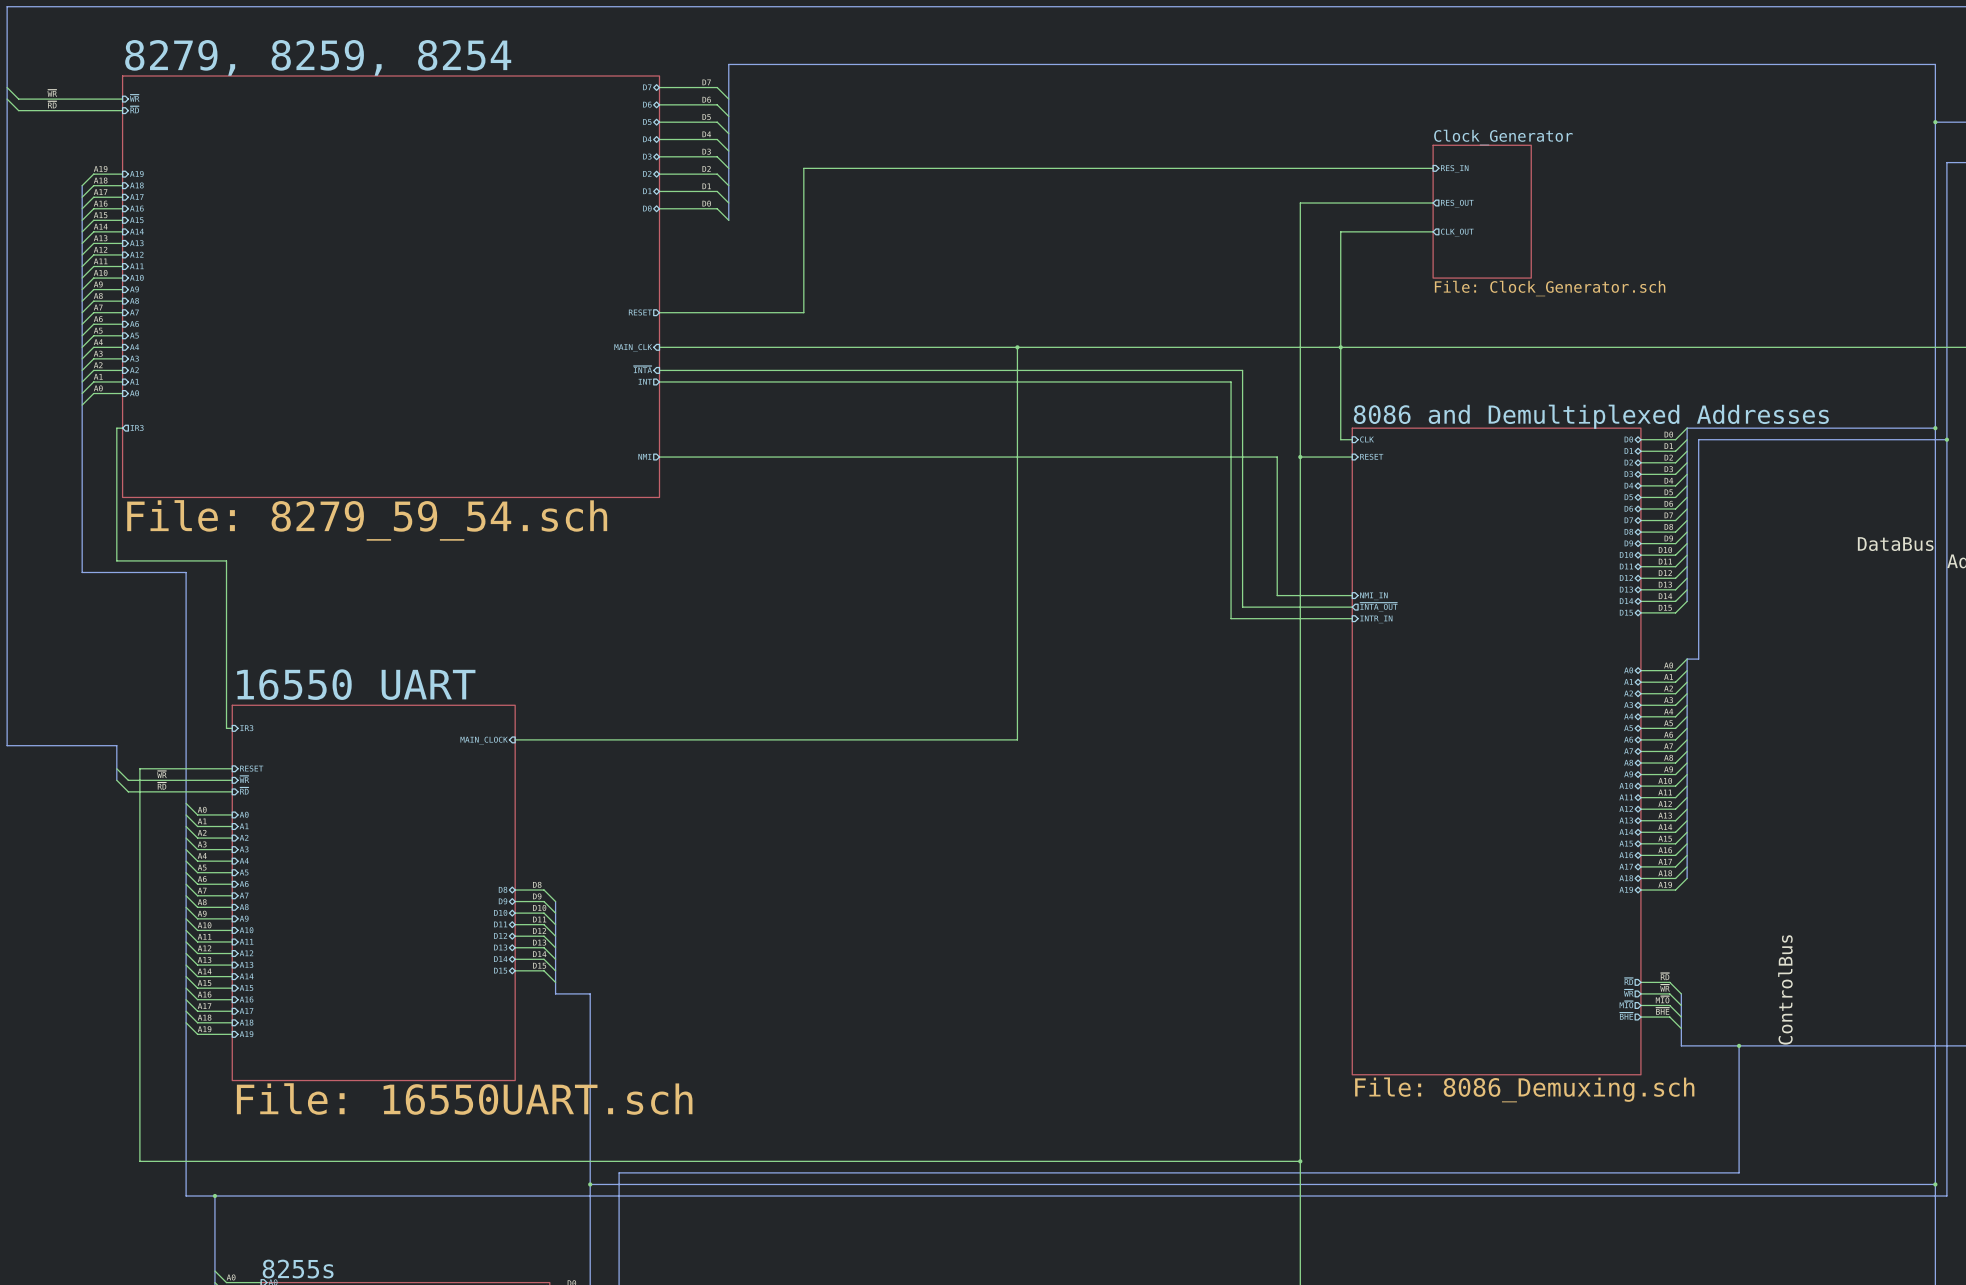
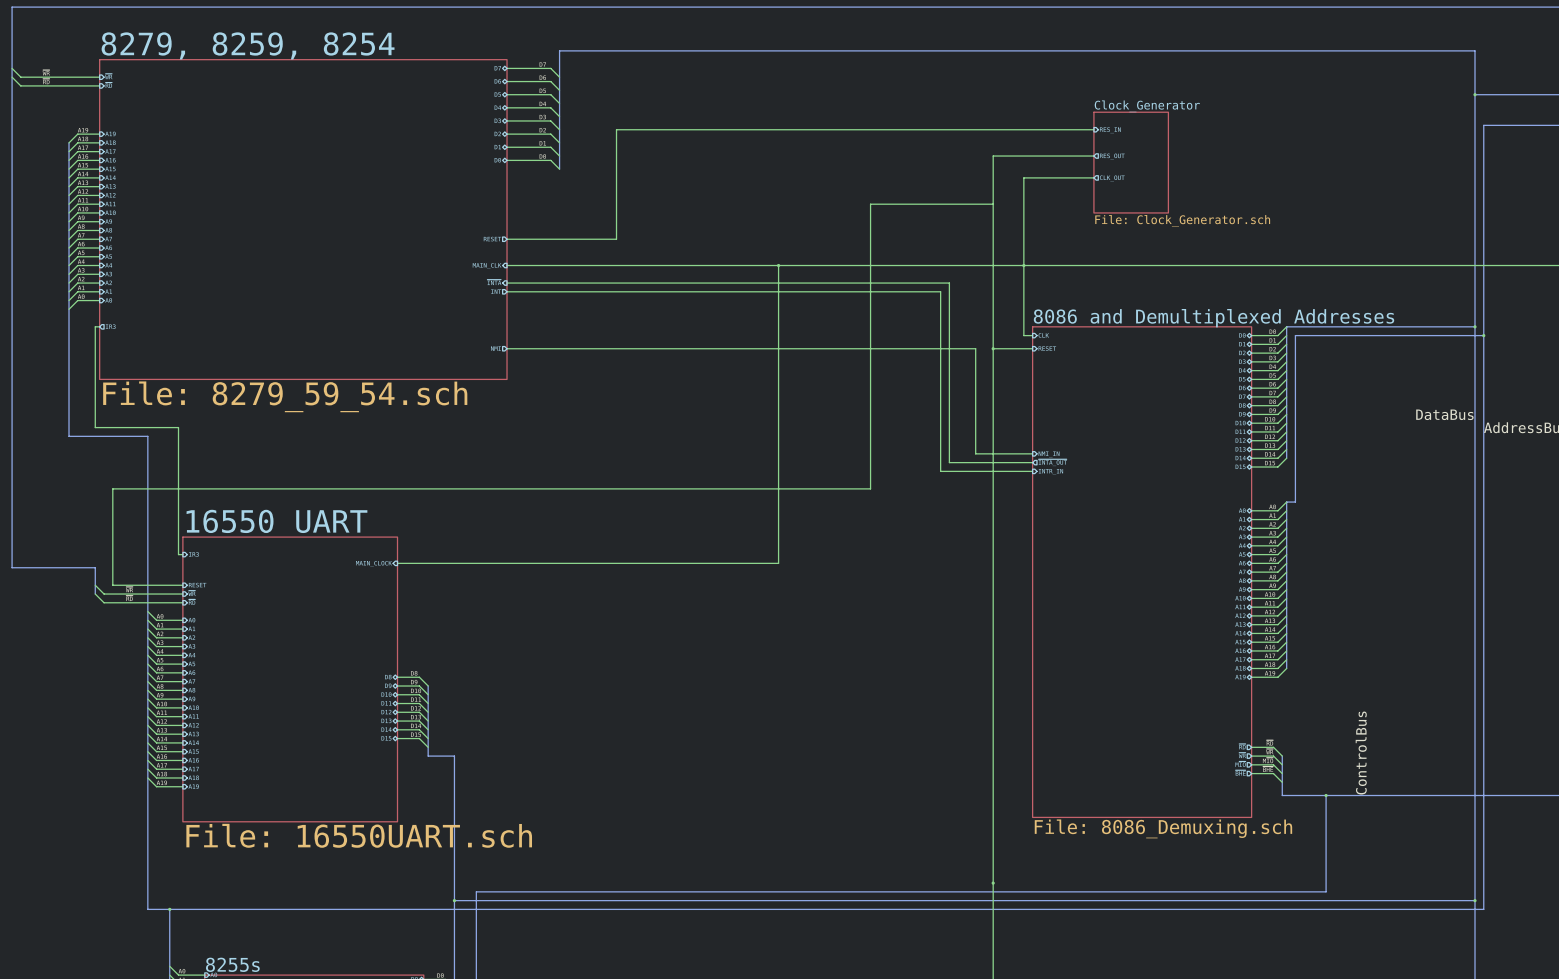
wire: (139, 768) (139, 1161) (1300, 1161) -> (112, 585) (112, 488) (870, 488) (870, 204) (993, 204)

